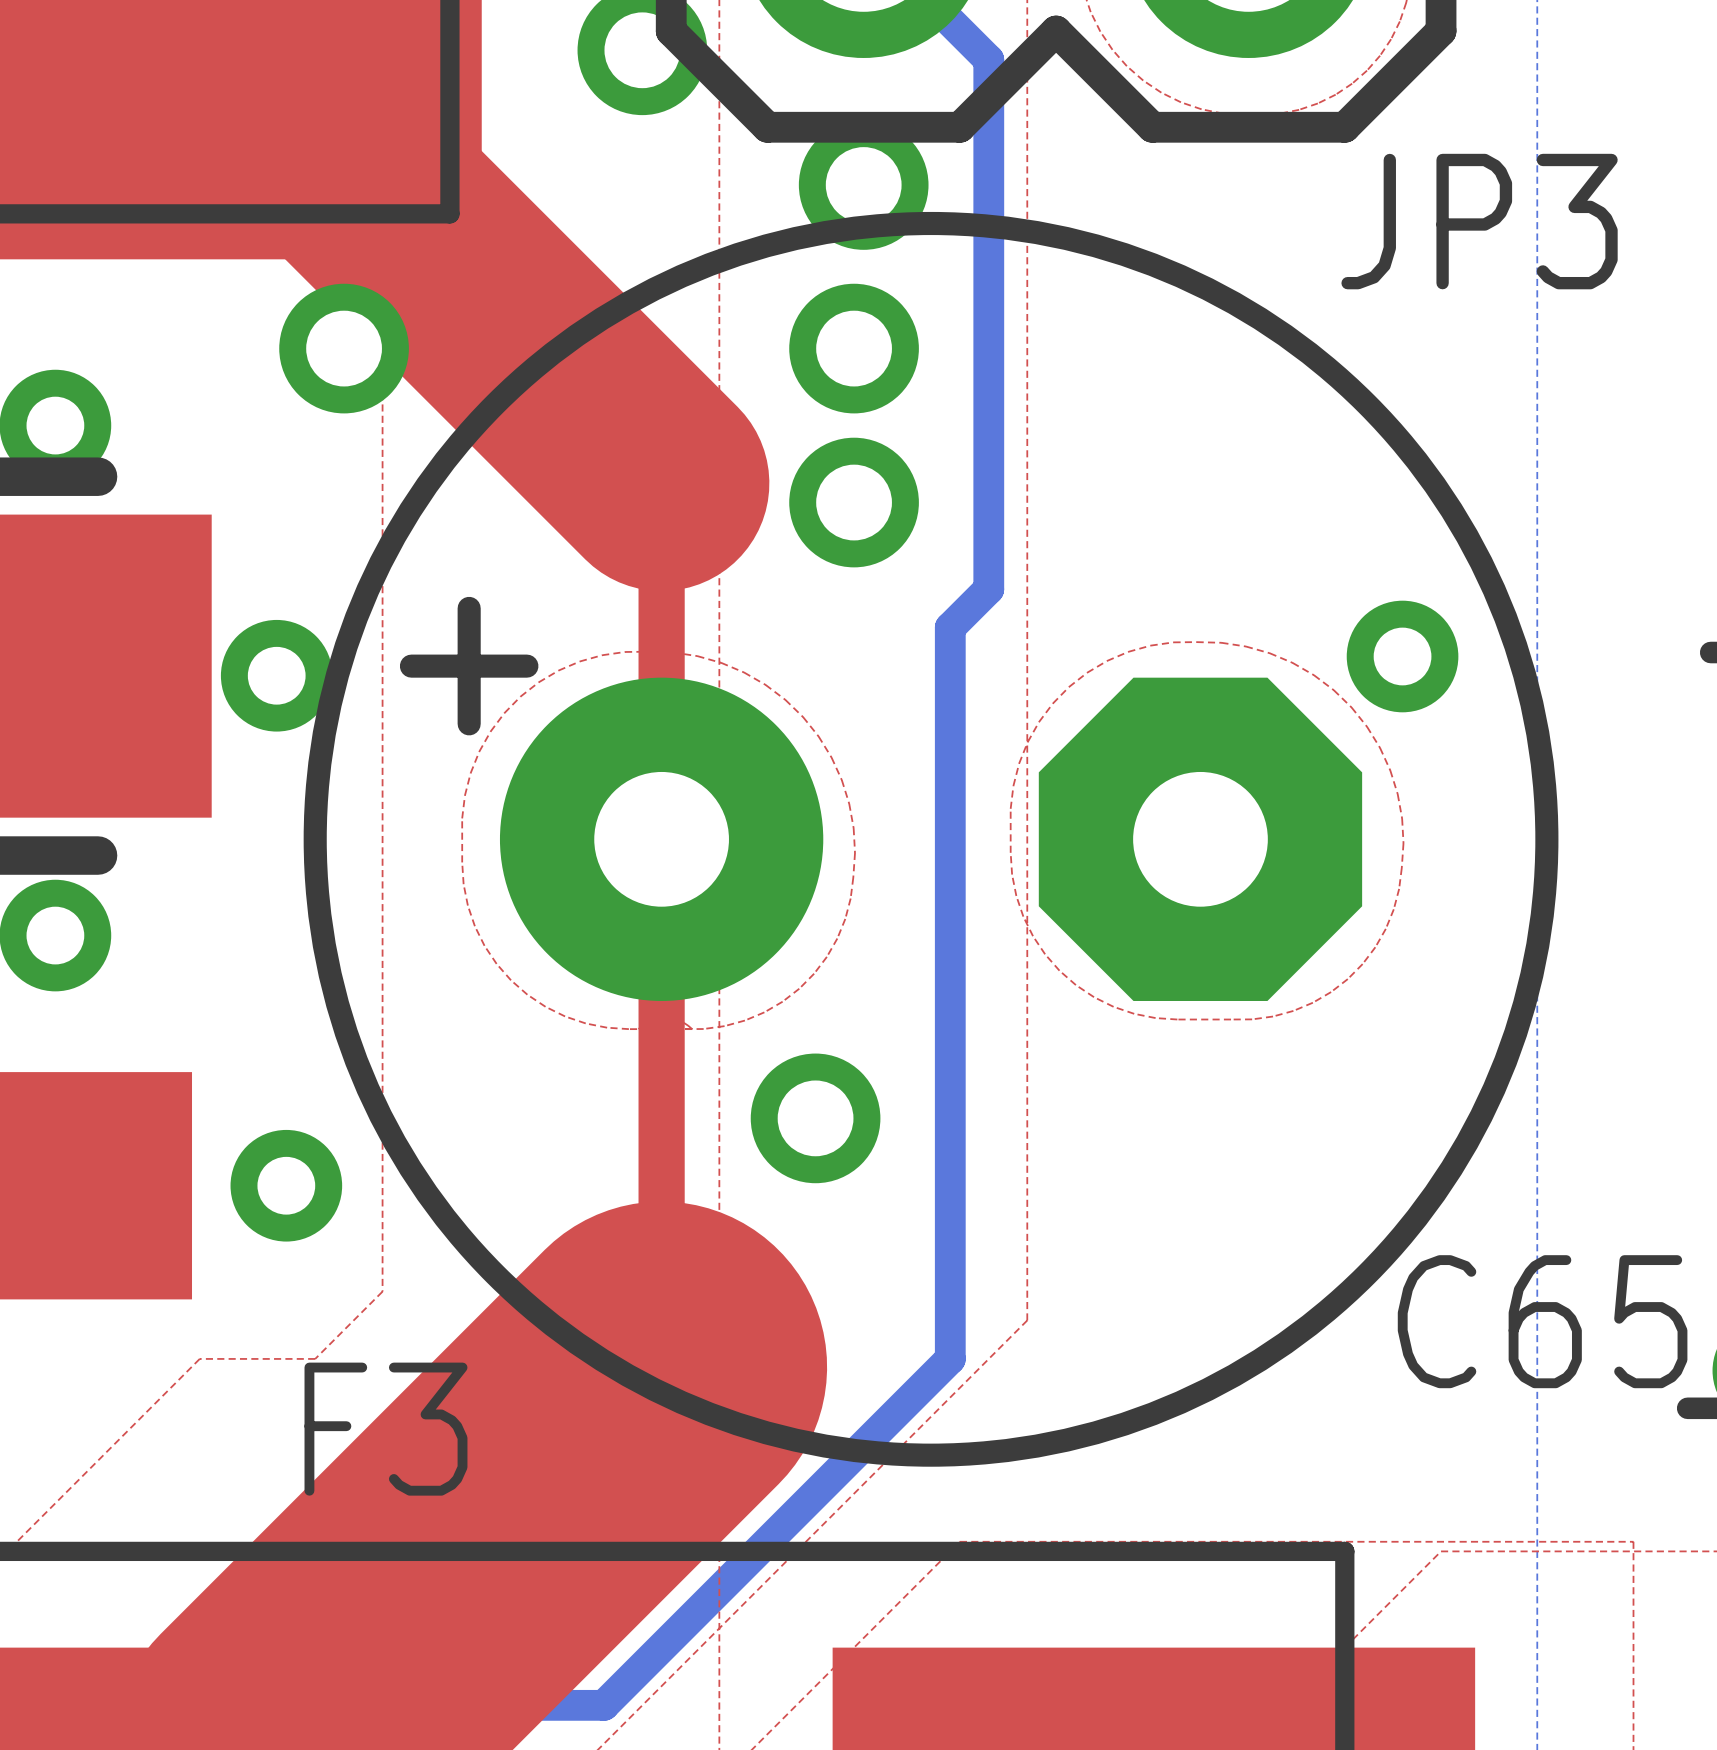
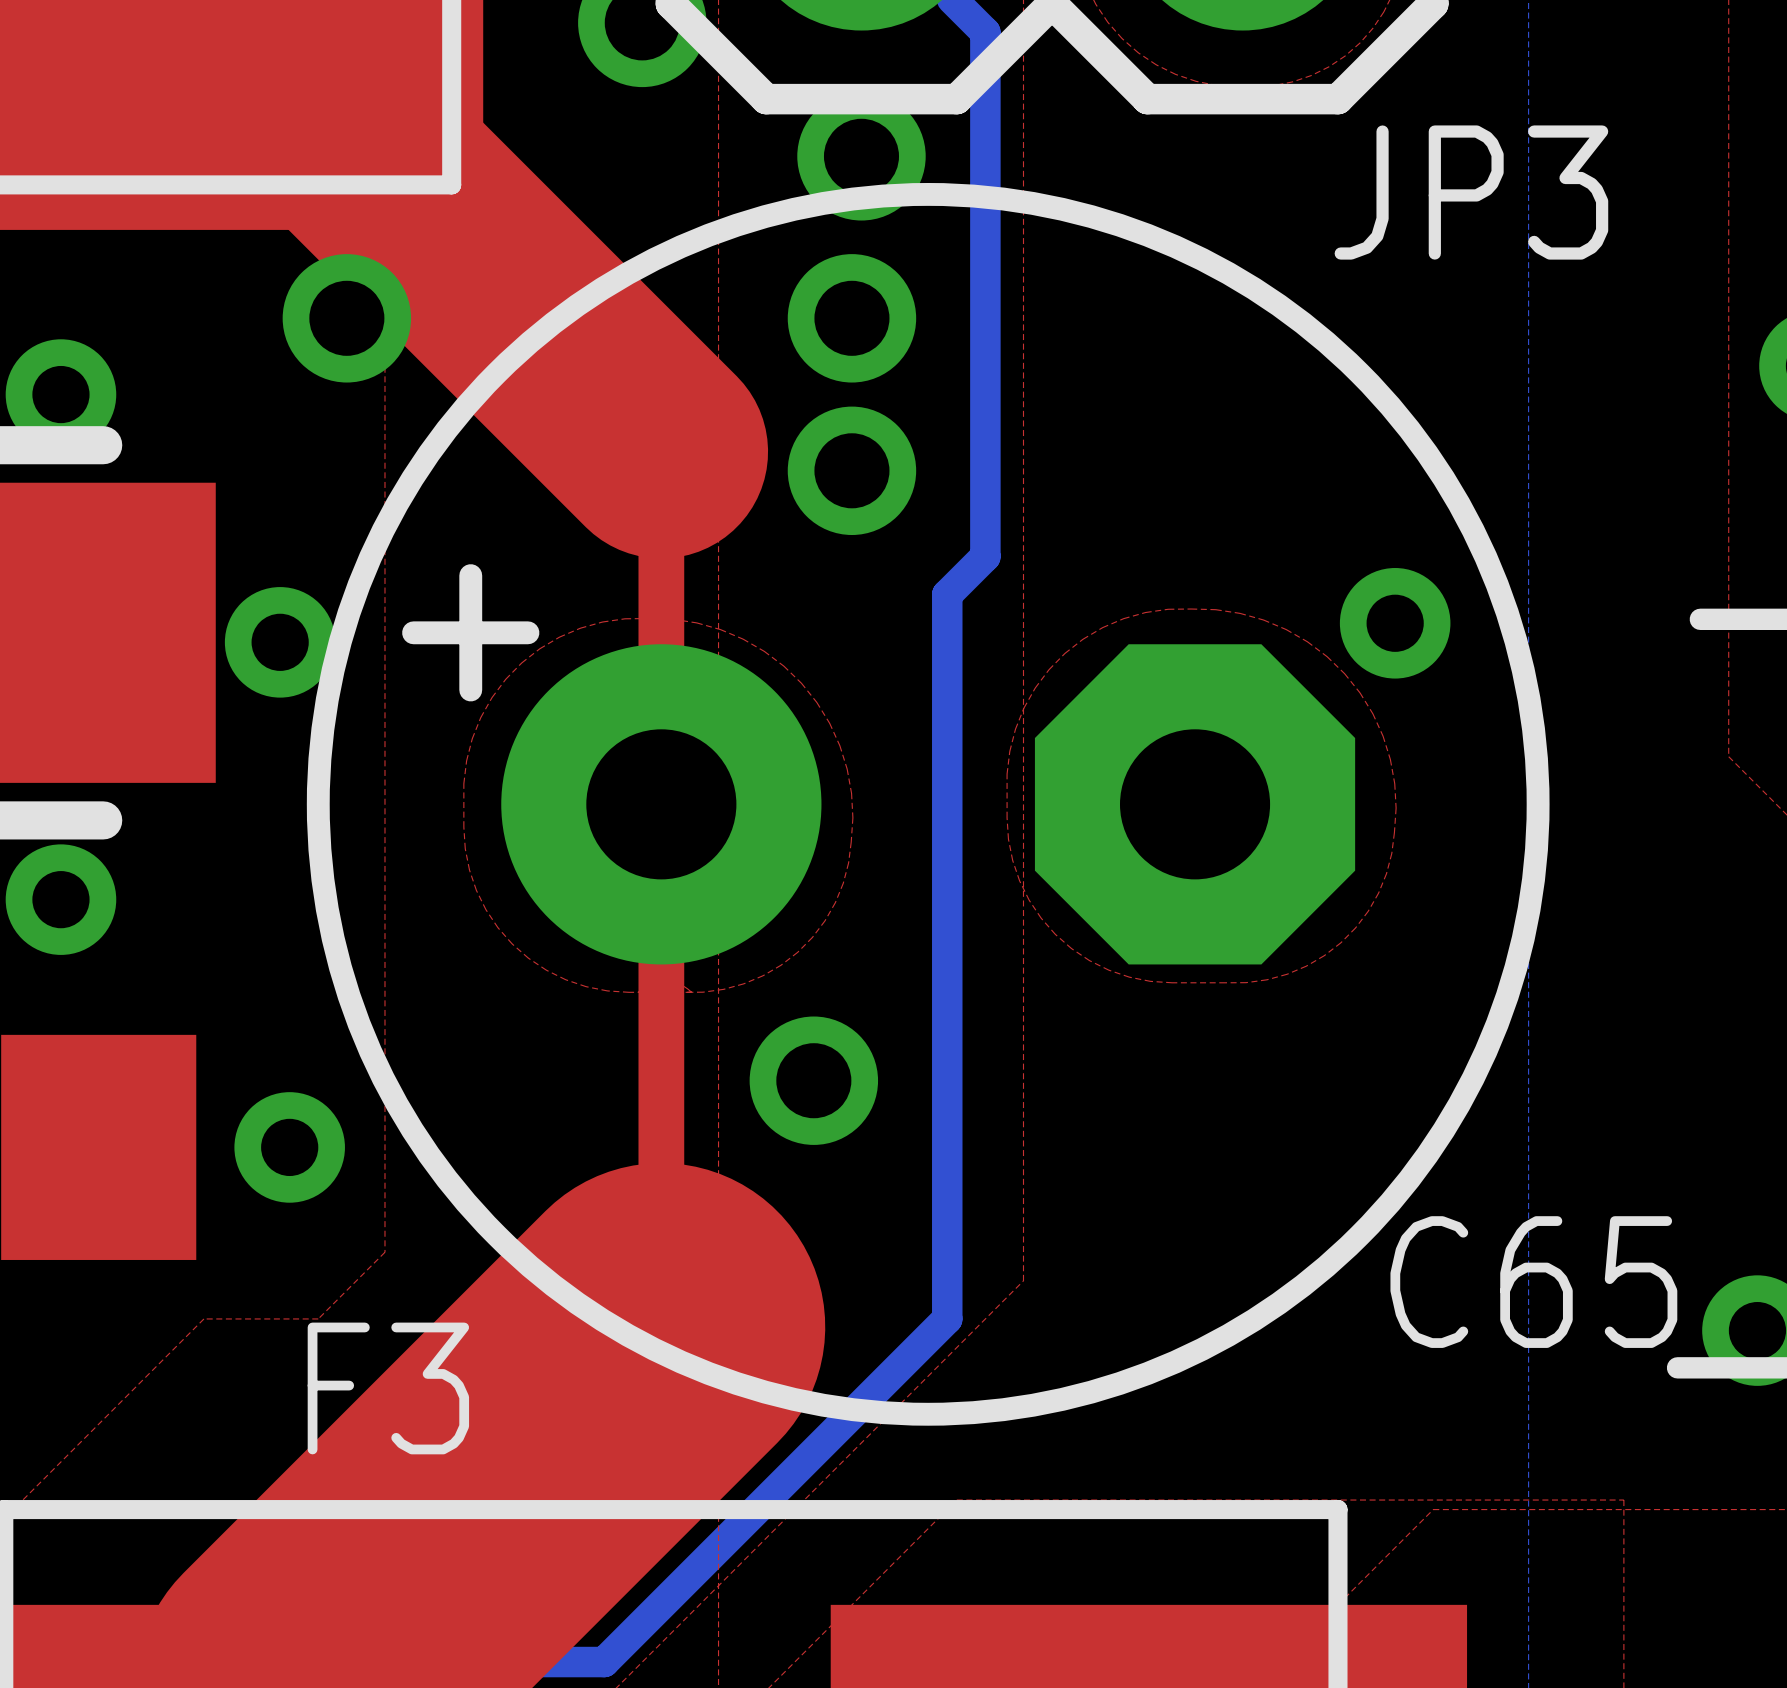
C65 footprint: [303, 211, 1559, 1467] -> [306, 182, 1550, 1426]

